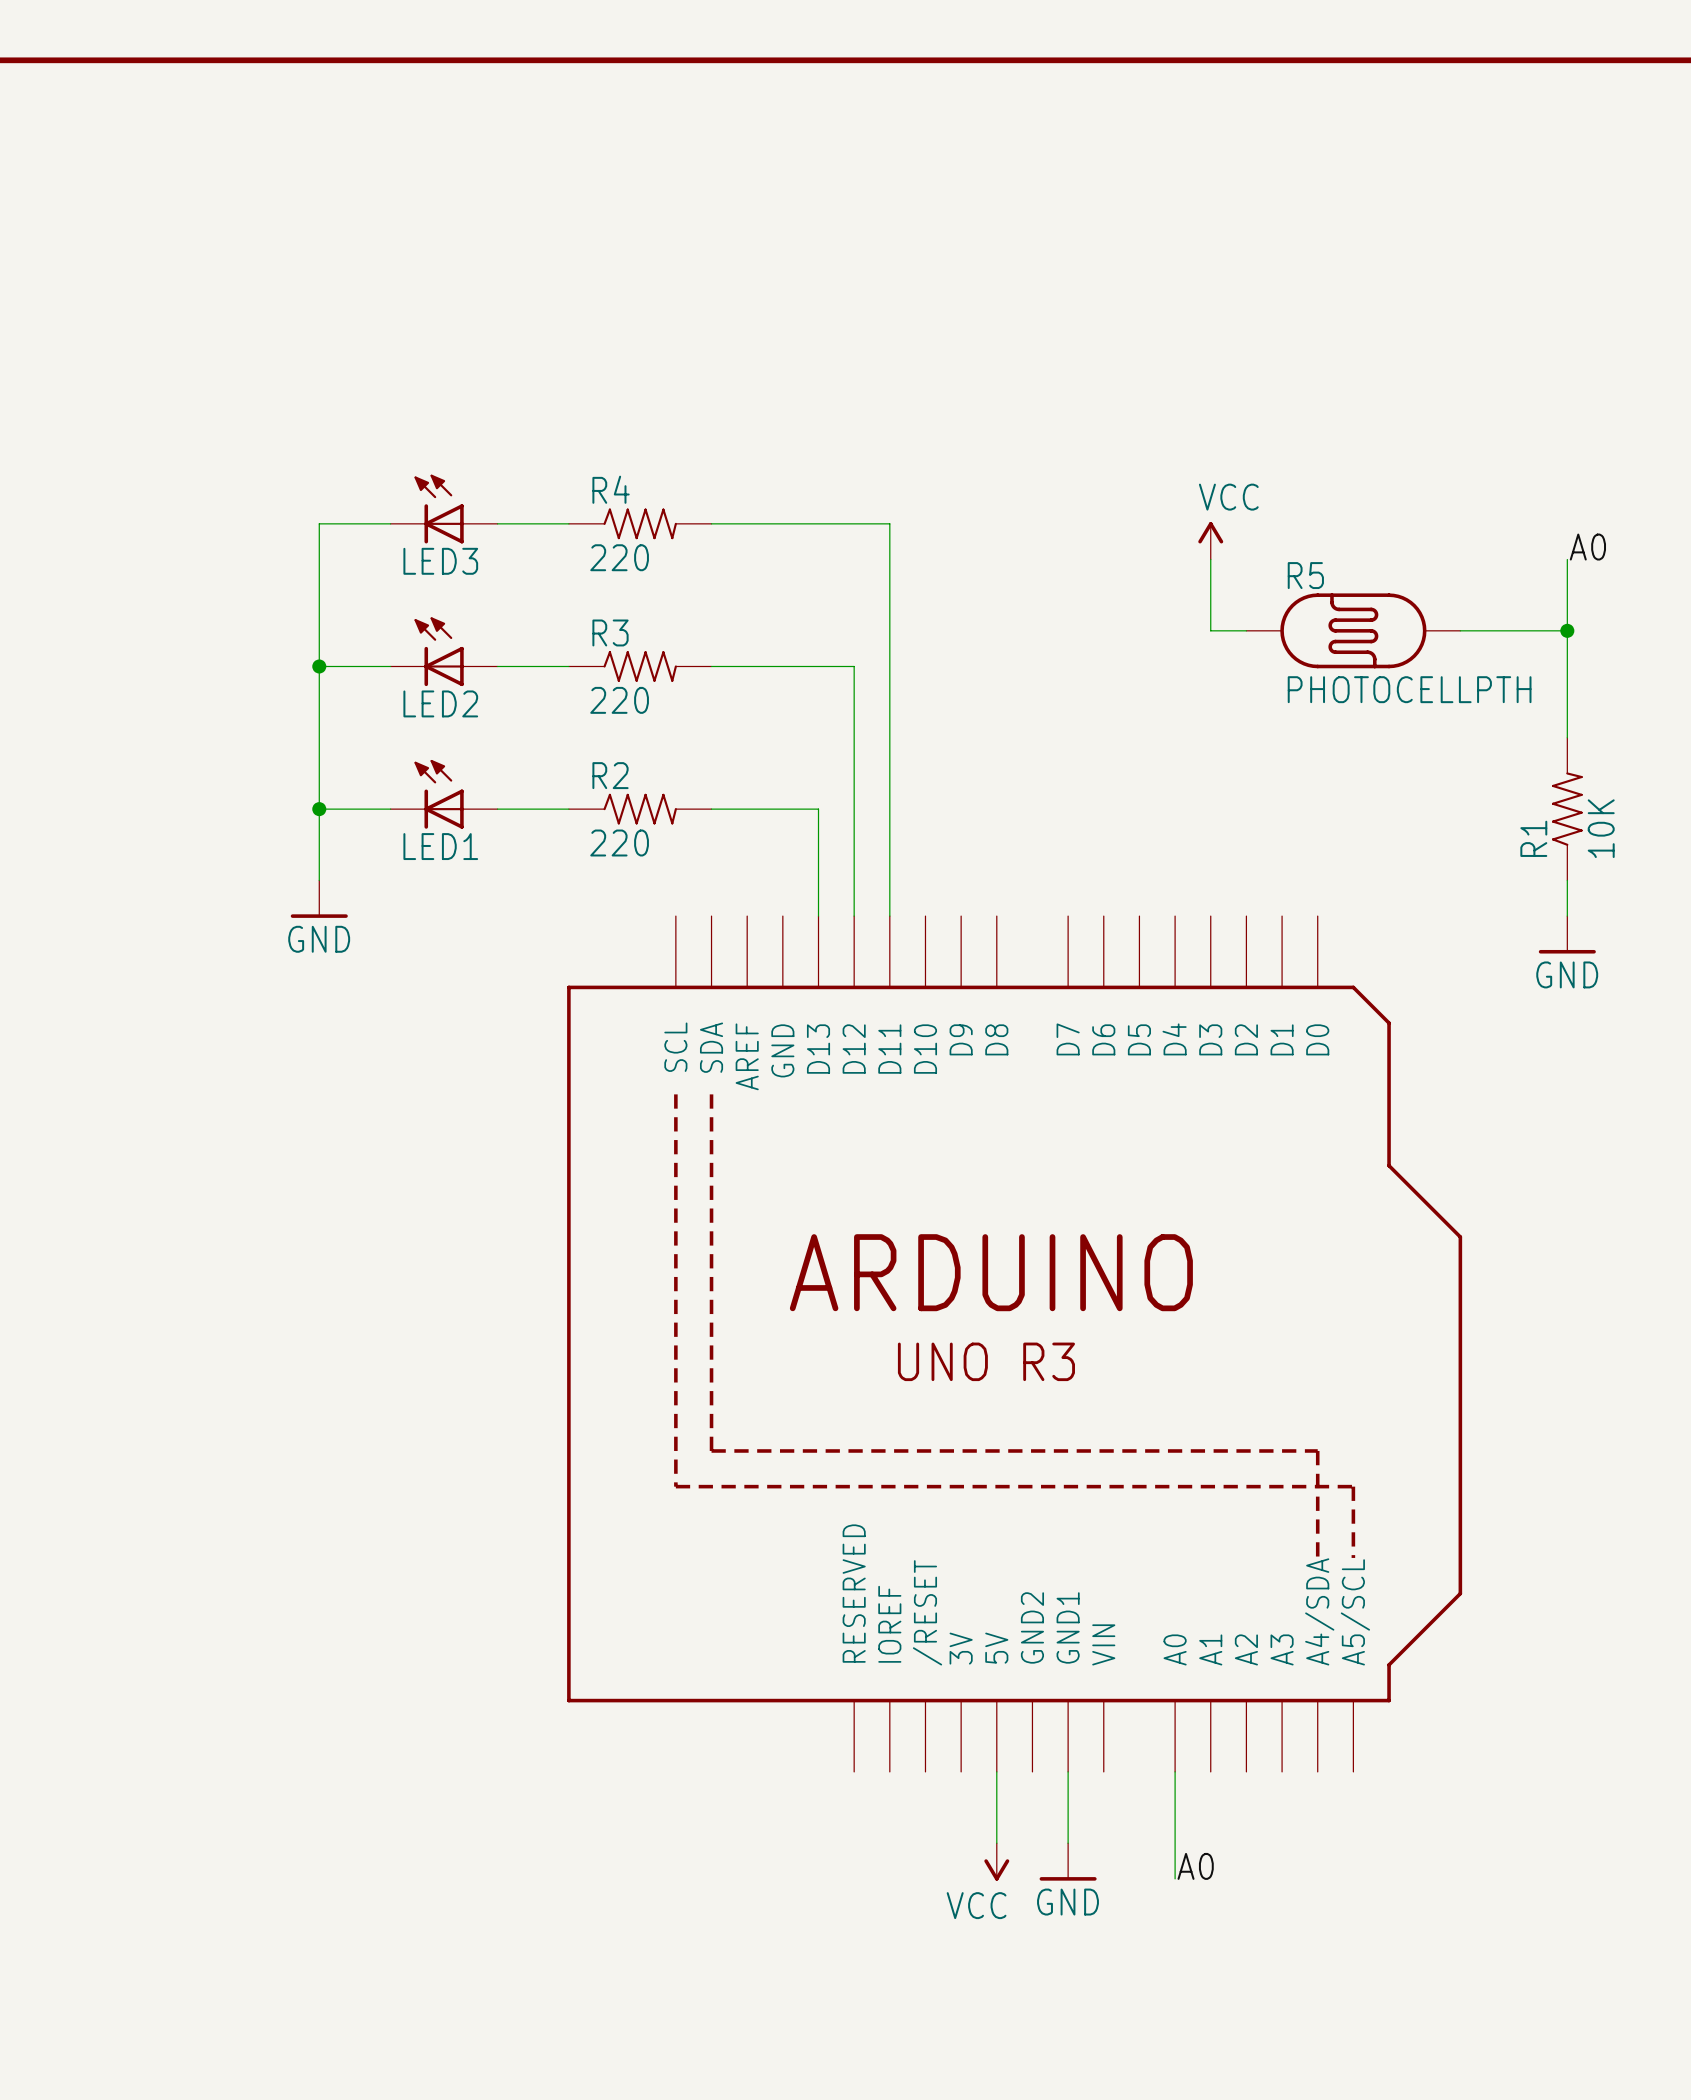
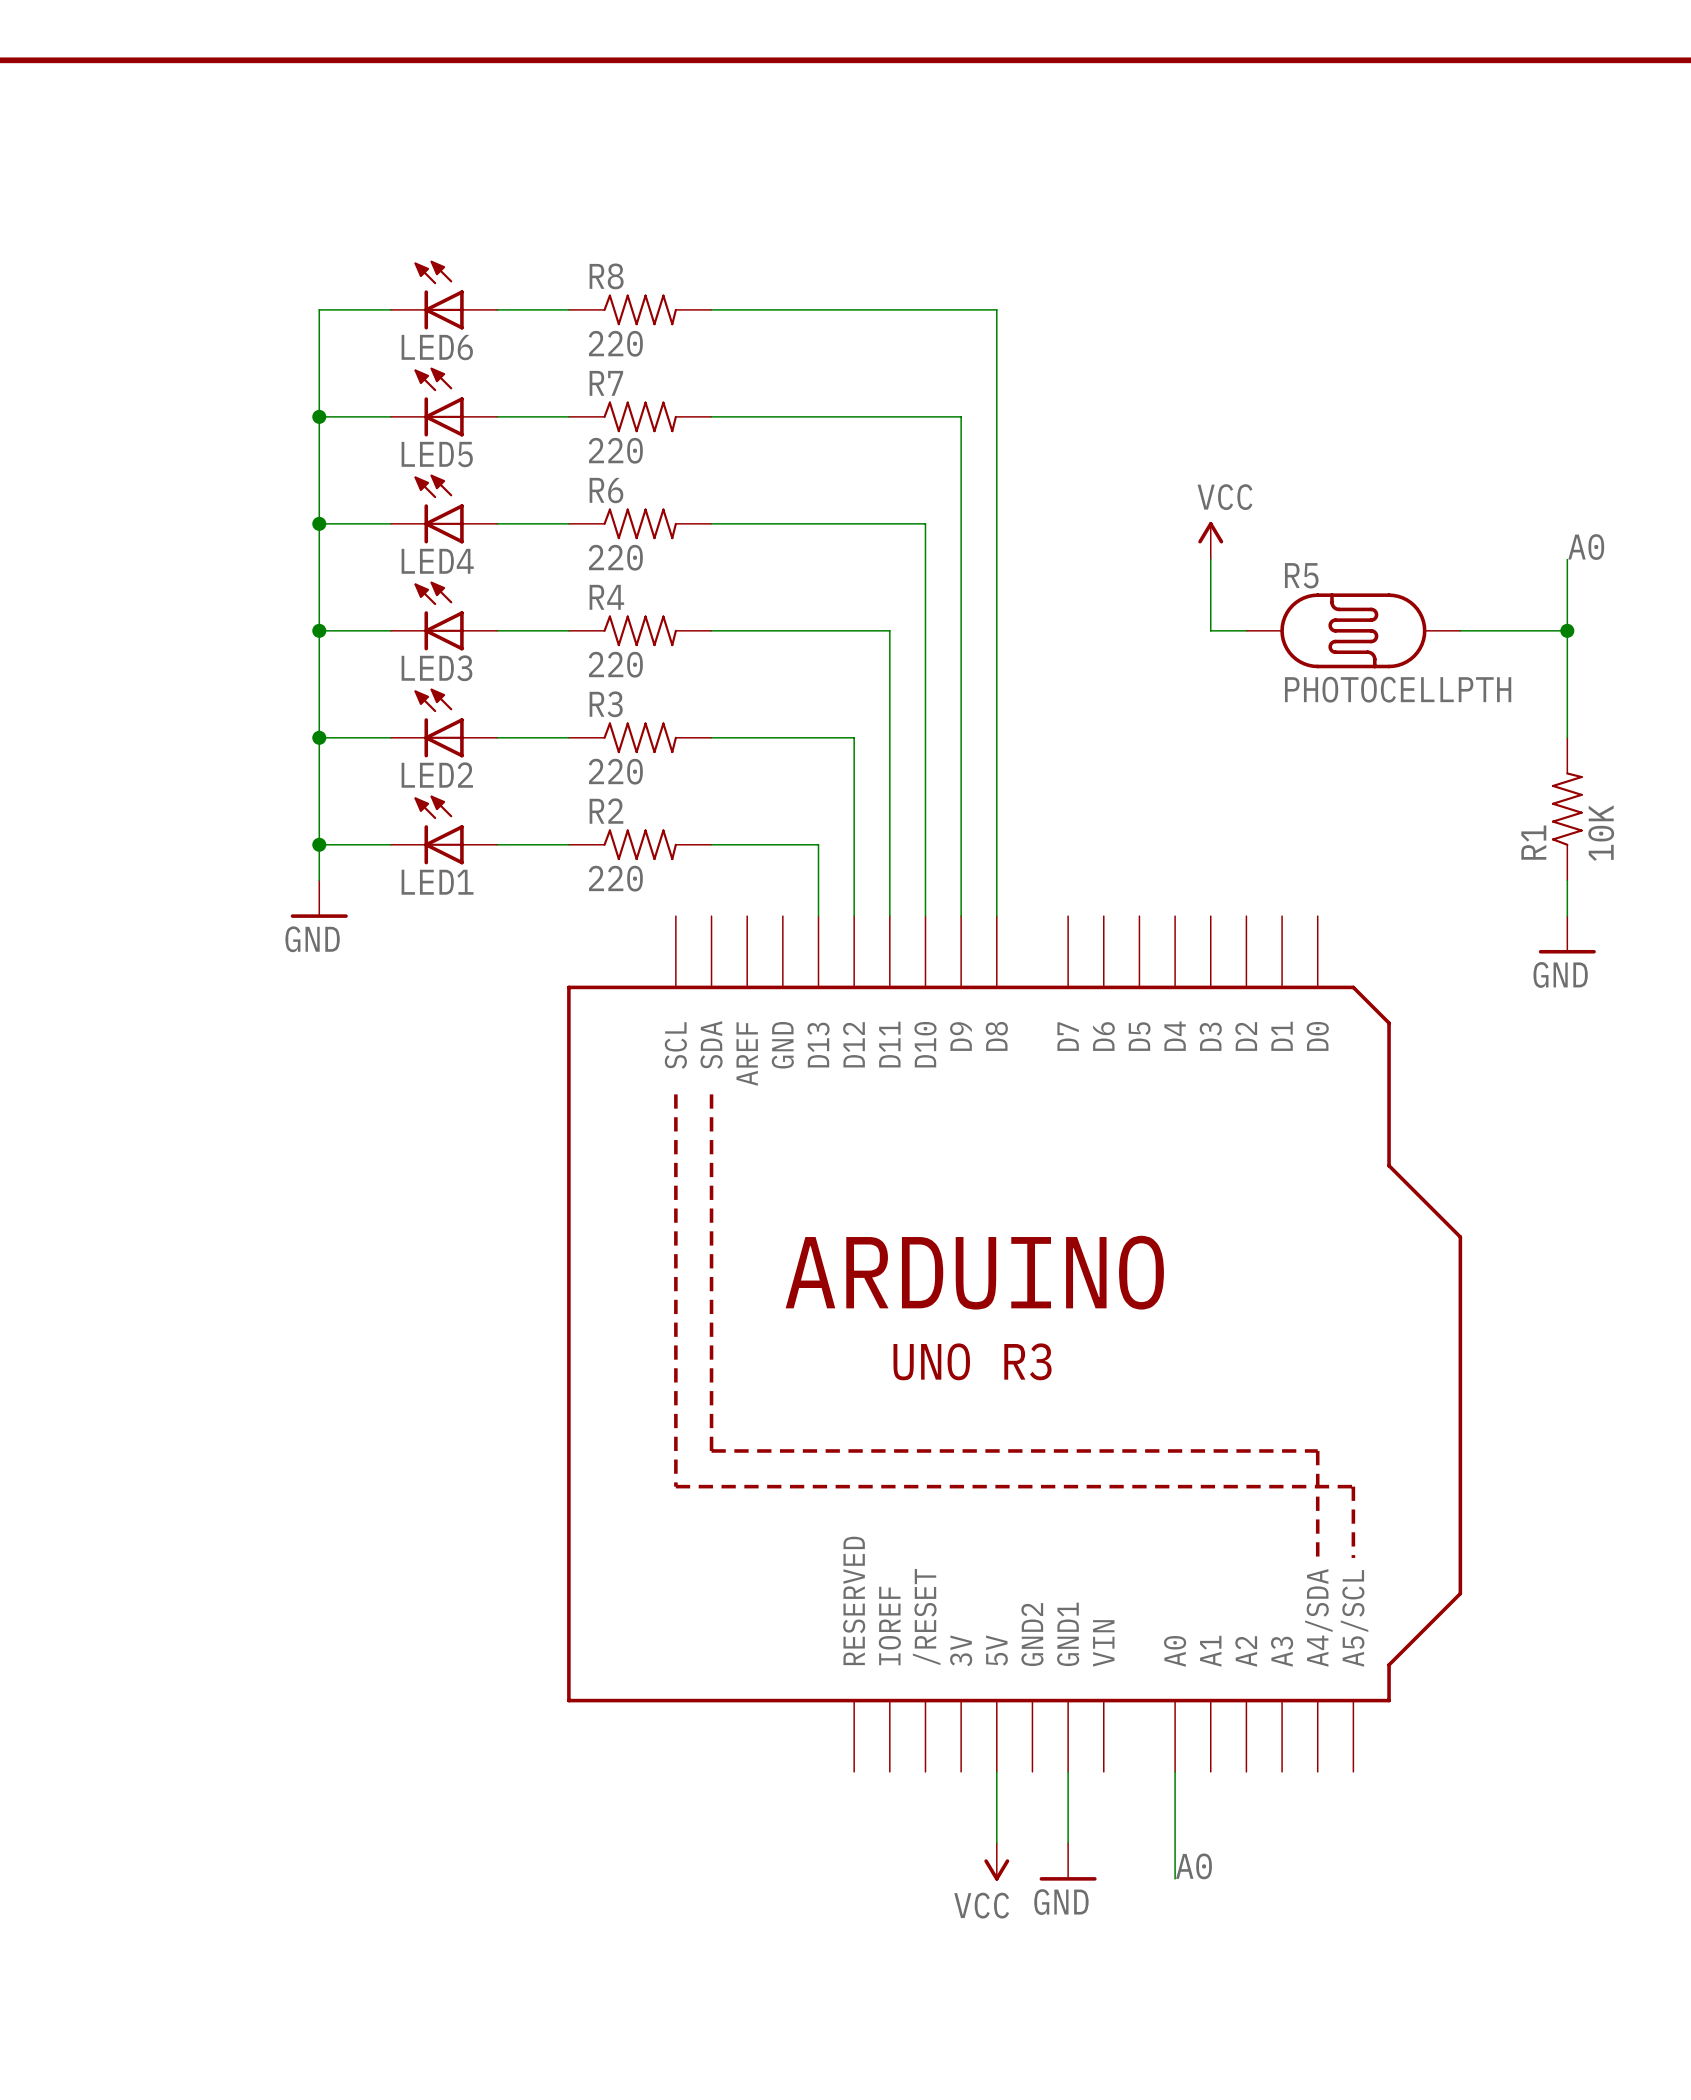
LED6: none -> (444, 295)
wire: none -> (390, 309) (319, 309) (319, 523)
wire: none -> (497, 309) (568, 309)
R8: none -> 220 (640, 309)
wire: none -> (711, 309) (996, 309) (996, 916)
LED5: none -> (444, 402)
wire: none -> (319, 416) (390, 416)
junction: none -> (319, 416)
wire: none -> (497, 416) (568, 416)
R7: none -> 220 (640, 416)
wire: none -> (711, 416) (961, 416) (961, 916)
R4 name: R4 (611, 489) -> R6 (606, 490)
junction: none -> (319, 523)
wire: (889, 523) (889, 630) -> (711, 630) (889, 630)
wire: none -> (889, 523) (925, 523) (925, 916)
LED3 name: LED3 (440, 561) -> LED4 (437, 561)
LED3: none -> (444, 616)
junction: none -> (319, 630)
R4: none -> 220 (640, 630)
LED2 position: (444, 651) -> (444, 723)
wire: (319, 666) (390, 666) -> (319, 630) (390, 630)
junction: (319, 666) -> none
wire: (497, 666) (568, 666) -> (497, 630) (568, 630)
R3 position: (640, 666) -> (640, 737)
wire: (711, 666) (854, 666) (854, 737) -> (711, 737) (854, 737)
wire: none -> (319, 737) (390, 737)
junction: none -> (319, 737)
wire: none -> (497, 737) (568, 737)
LED1 position: (444, 794) -> (444, 829)
wire: (319, 809) (390, 809) -> (319, 844) (390, 844)
junction: (319, 809) -> none
wire: (497, 809) (568, 809) -> (497, 844) (568, 844)
R2 position: (640, 809) -> (640, 844)
wire: (711, 809) (818, 809) (818, 844) -> (711, 844) (818, 844)
junction: none -> (319, 844)

